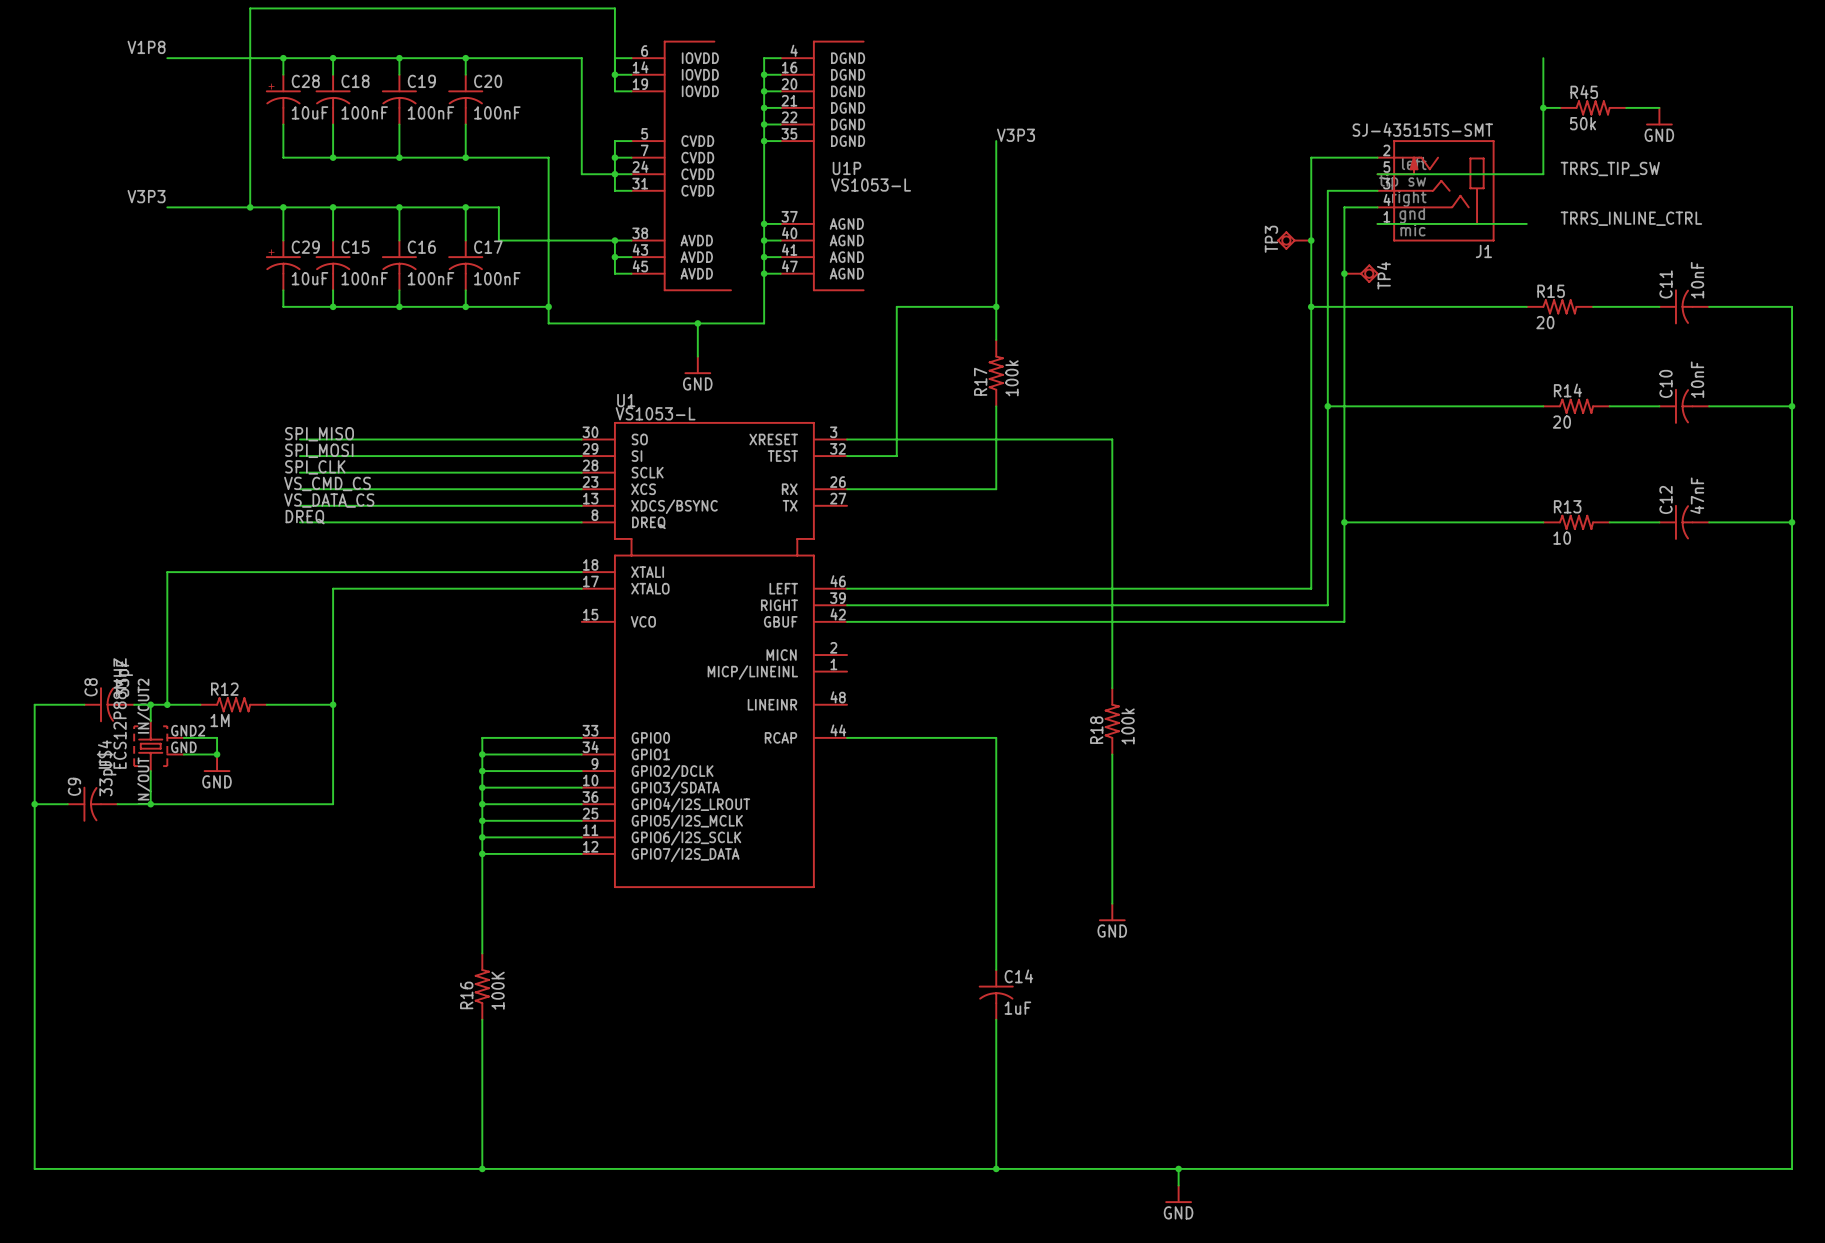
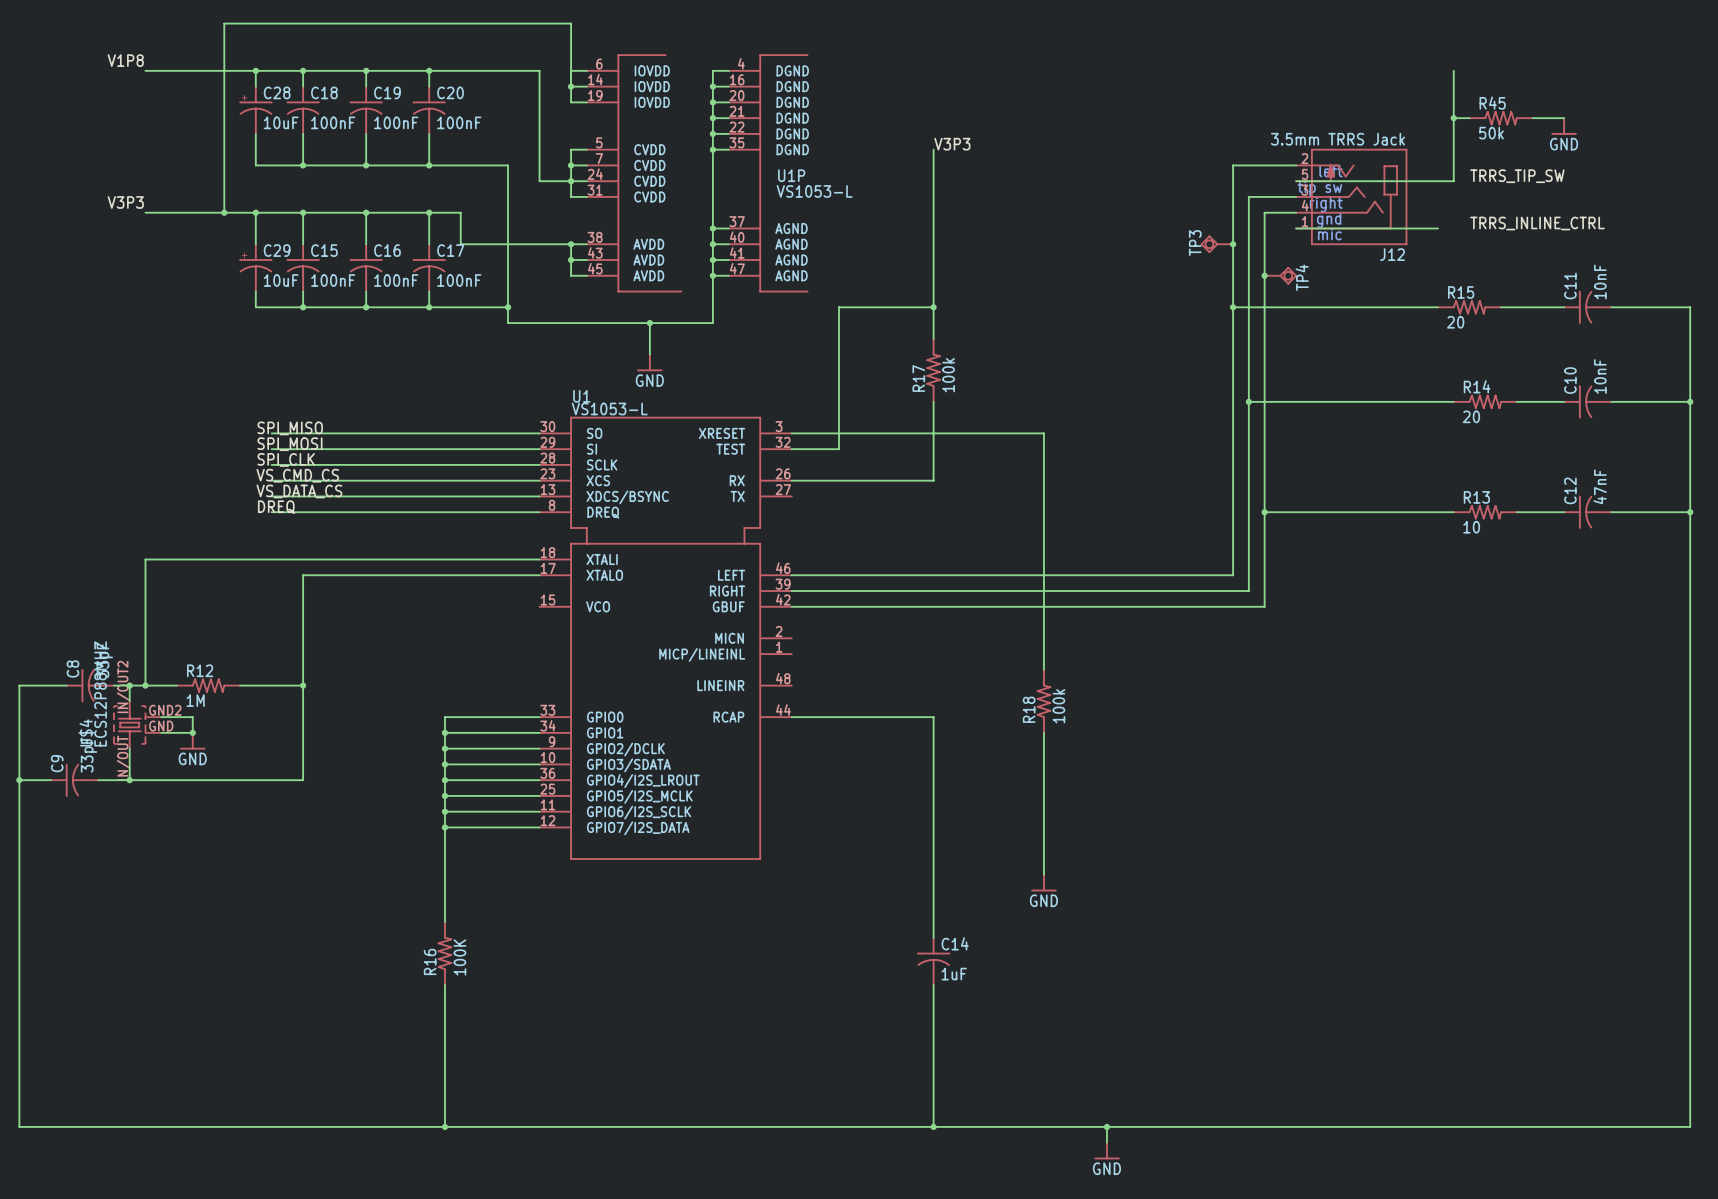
J1 value: SJ-43515TS-SMT (1422, 129) -> 3.5mm TRRS Jack (1337, 139)
J1 name: J1 (1483, 251) -> J12 (1392, 254)

